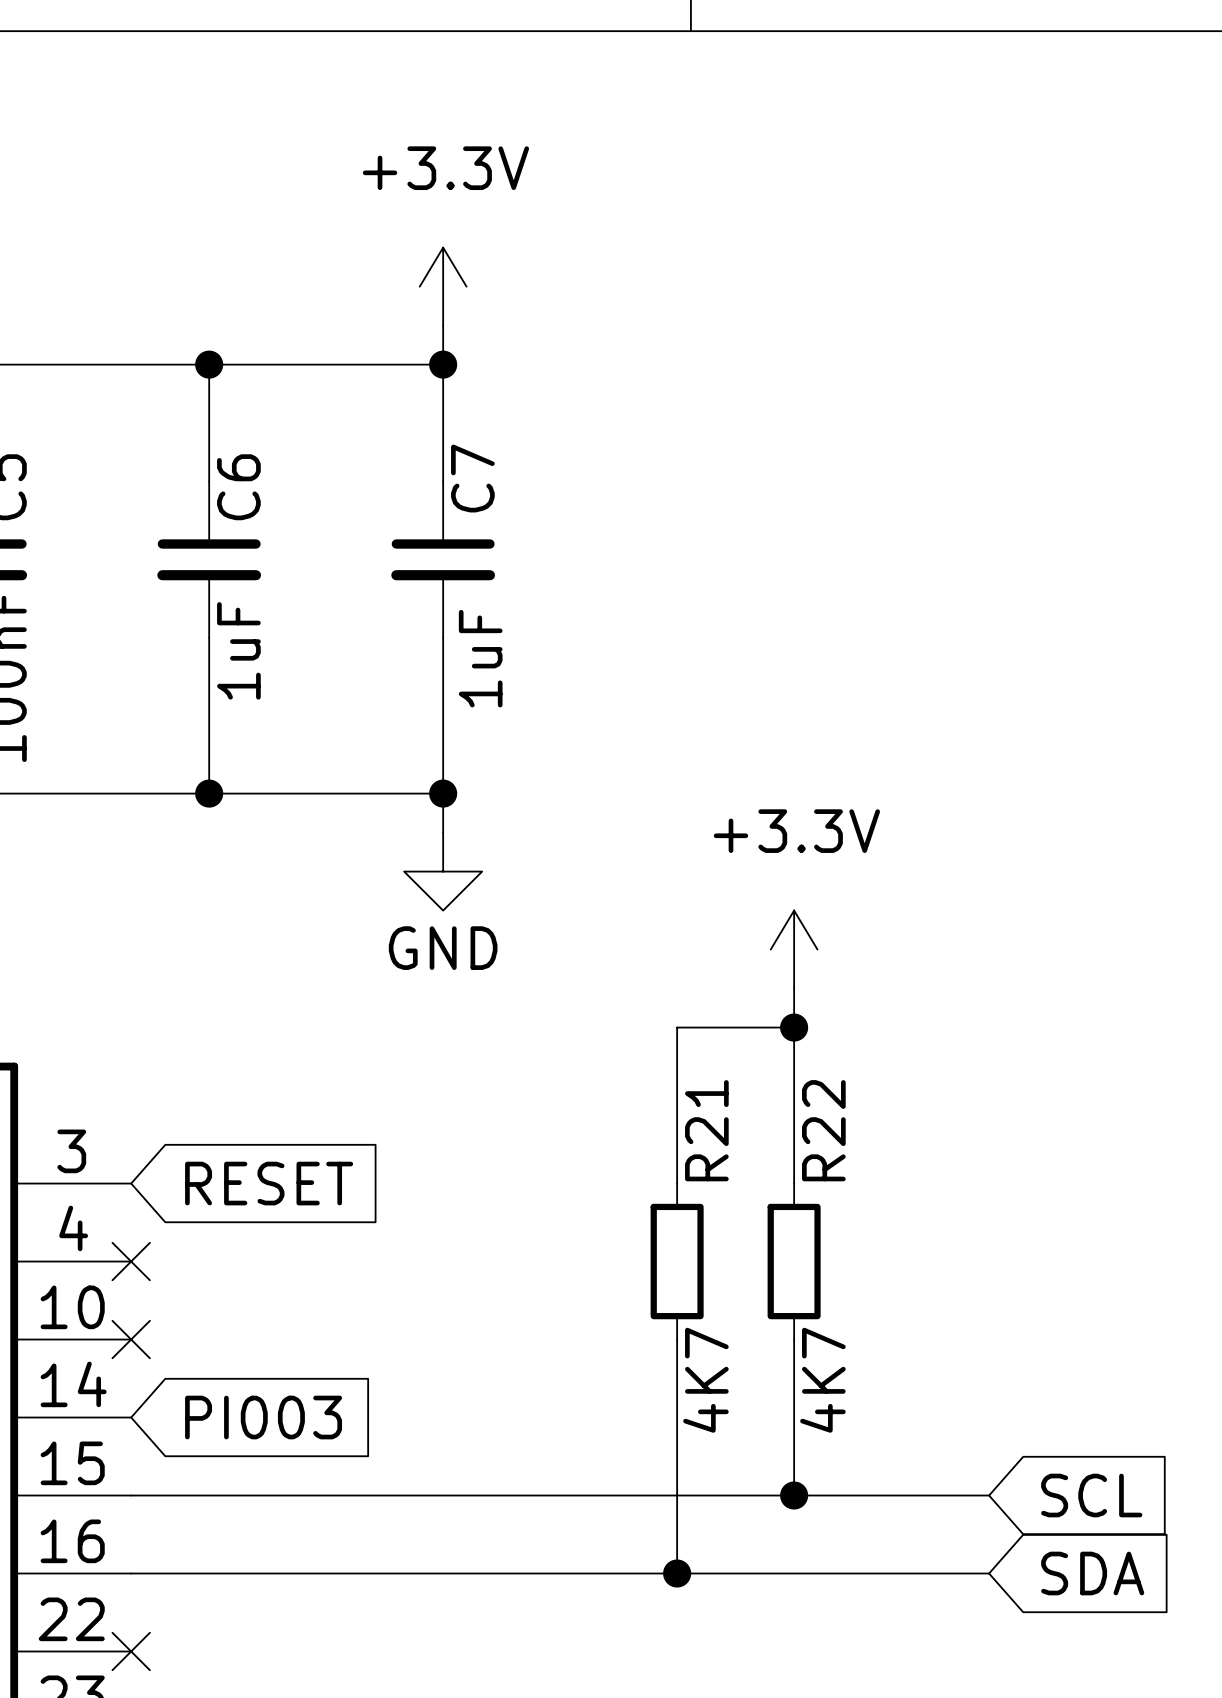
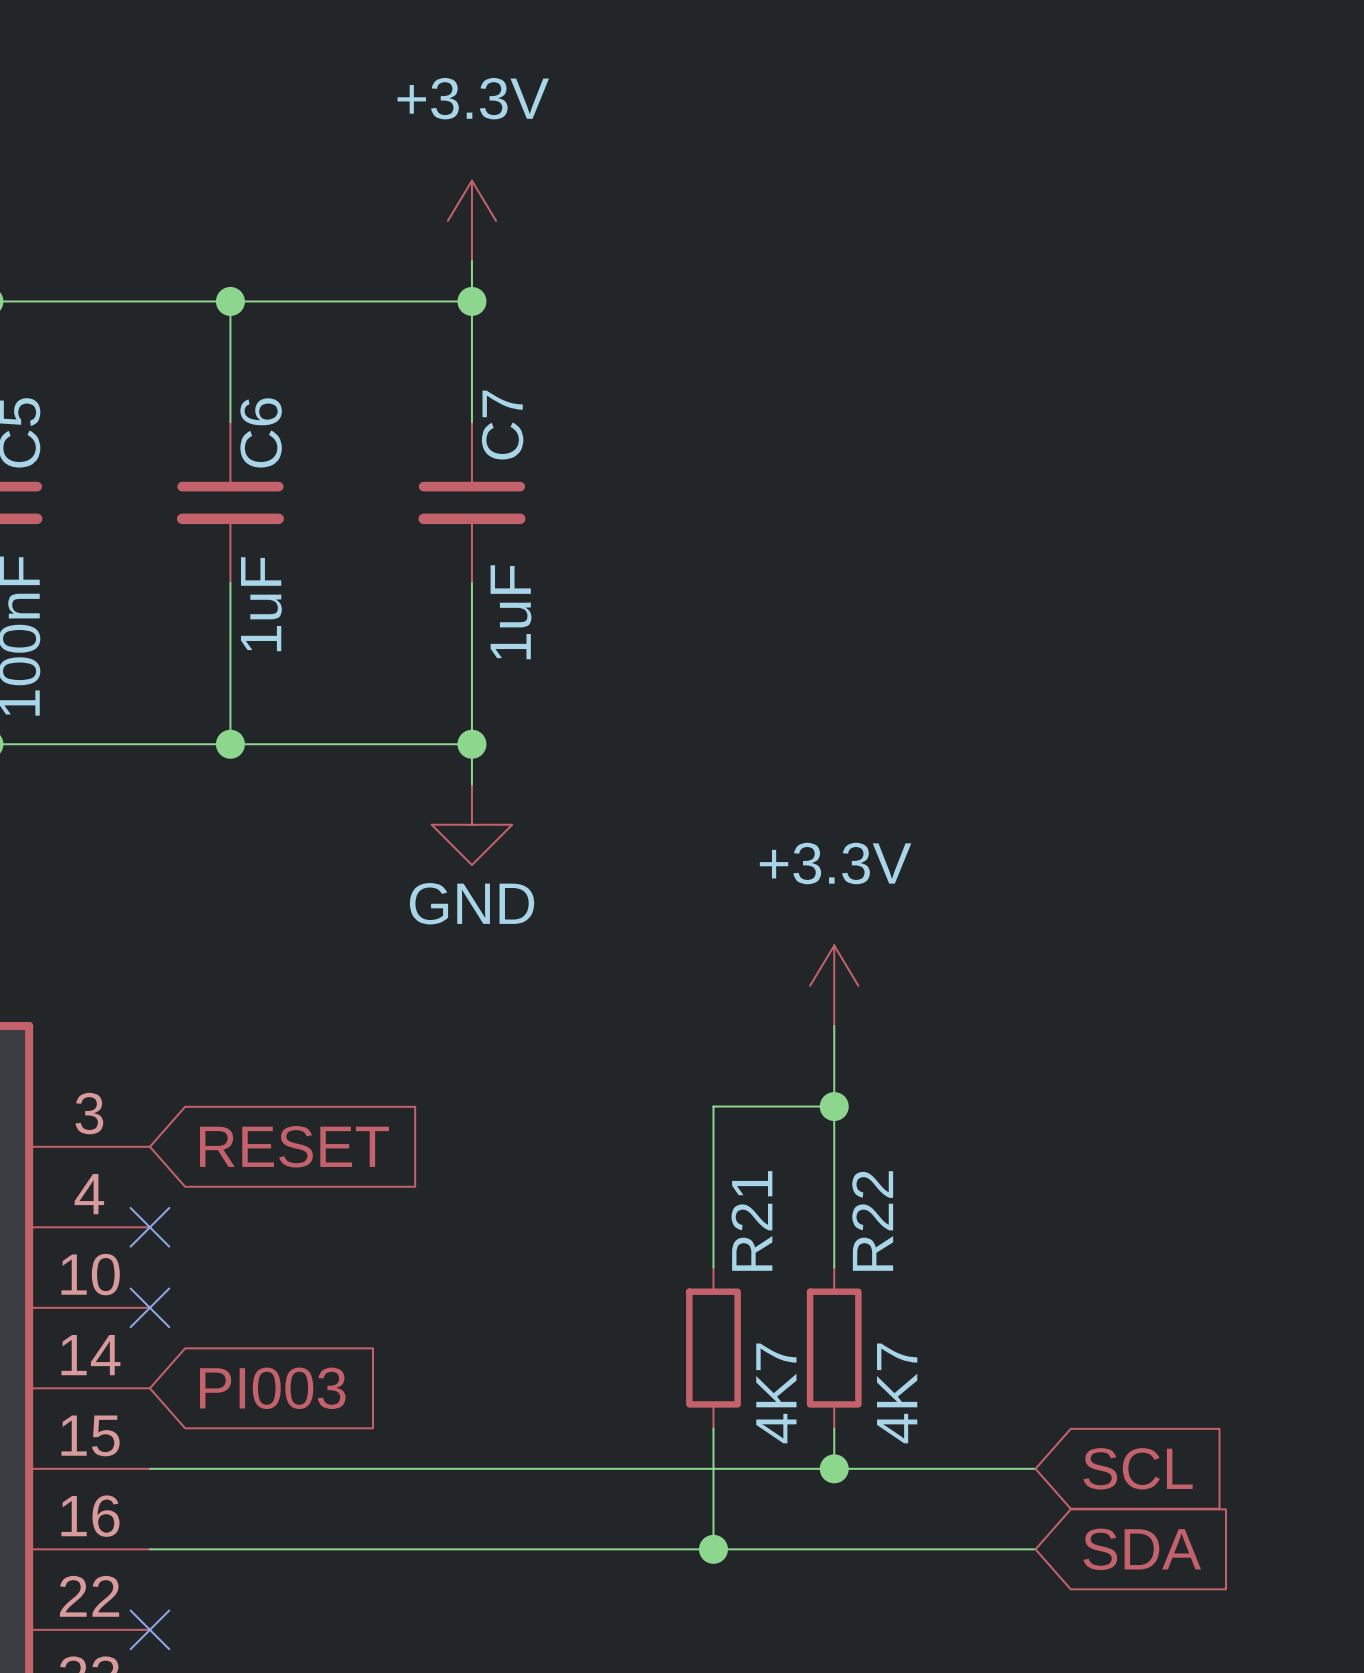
power symbol position: +3.3V (794, 949) -> +3.3V (834, 985)
wire: (794, 1027) (677, 1027) (677, 1144) -> (834, 1106) (713, 1106)
junction position: (794, 1027) -> (834, 1106)
R21 name position: R21 (706, 1130) -> R21 (751, 1220)
R22 name position: R22 (823, 1130) -> R22 (872, 1221)
R21 position: (677, 1261) -> (713, 1348)
R22 position: (794, 1261) -> (834, 1348)
wire: (677, 1339) (677, 1456) -> (713, 1146) (713, 1267)
wire: (794, 1339) (794, 1456) -> (834, 1146) (834, 1267)
R21 value position: 4K7 (705, 1380) -> 4K7 (776, 1393)
R22 value position: 4K7 (822, 1380) -> 4K7 (897, 1393)

